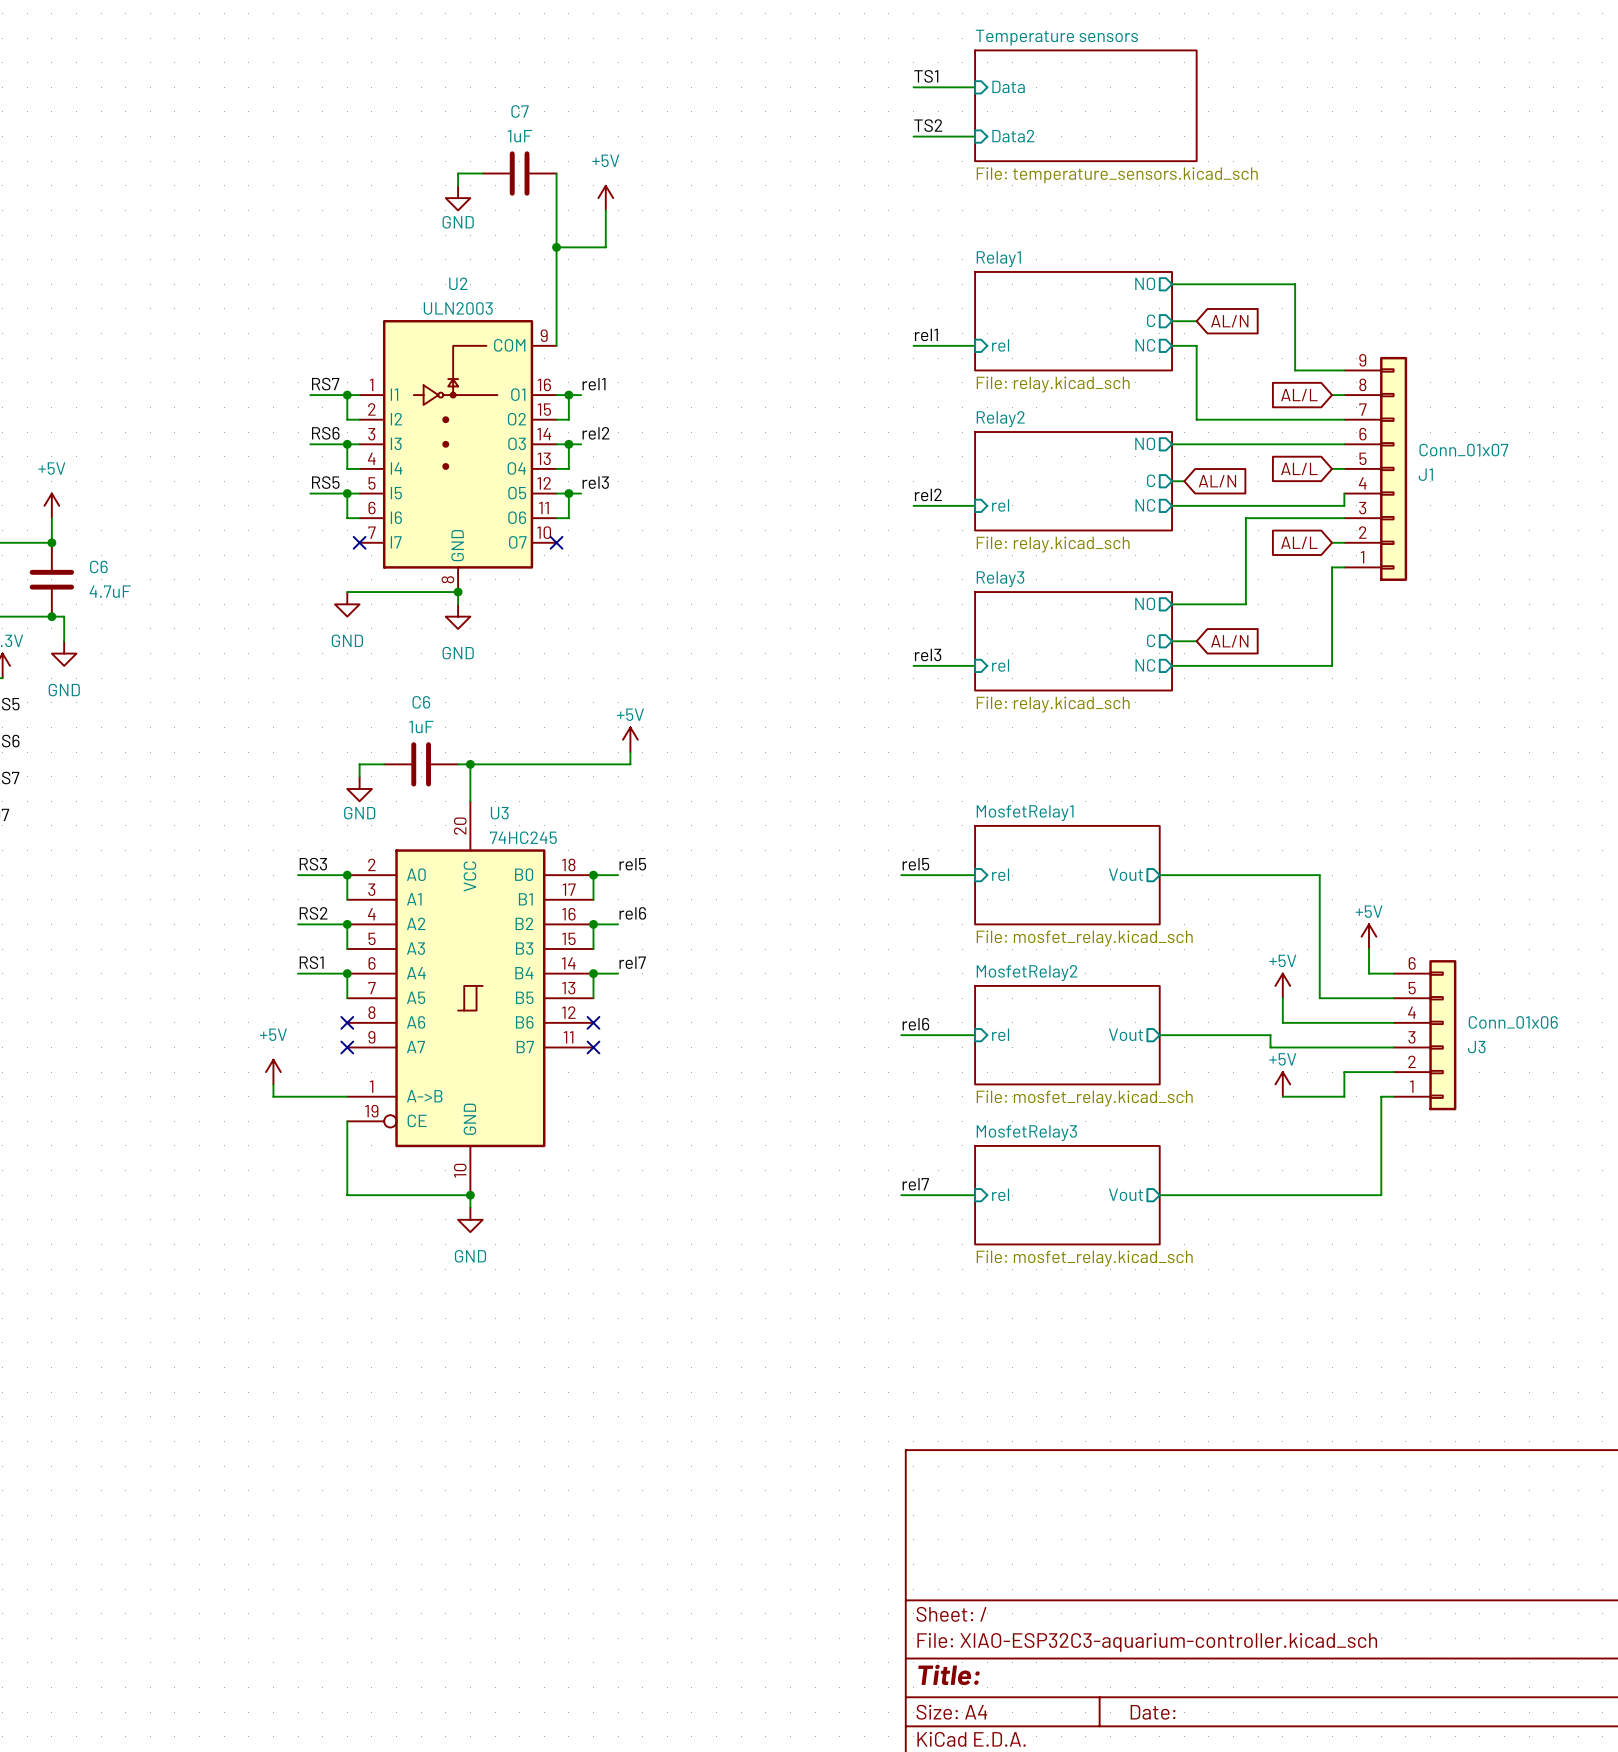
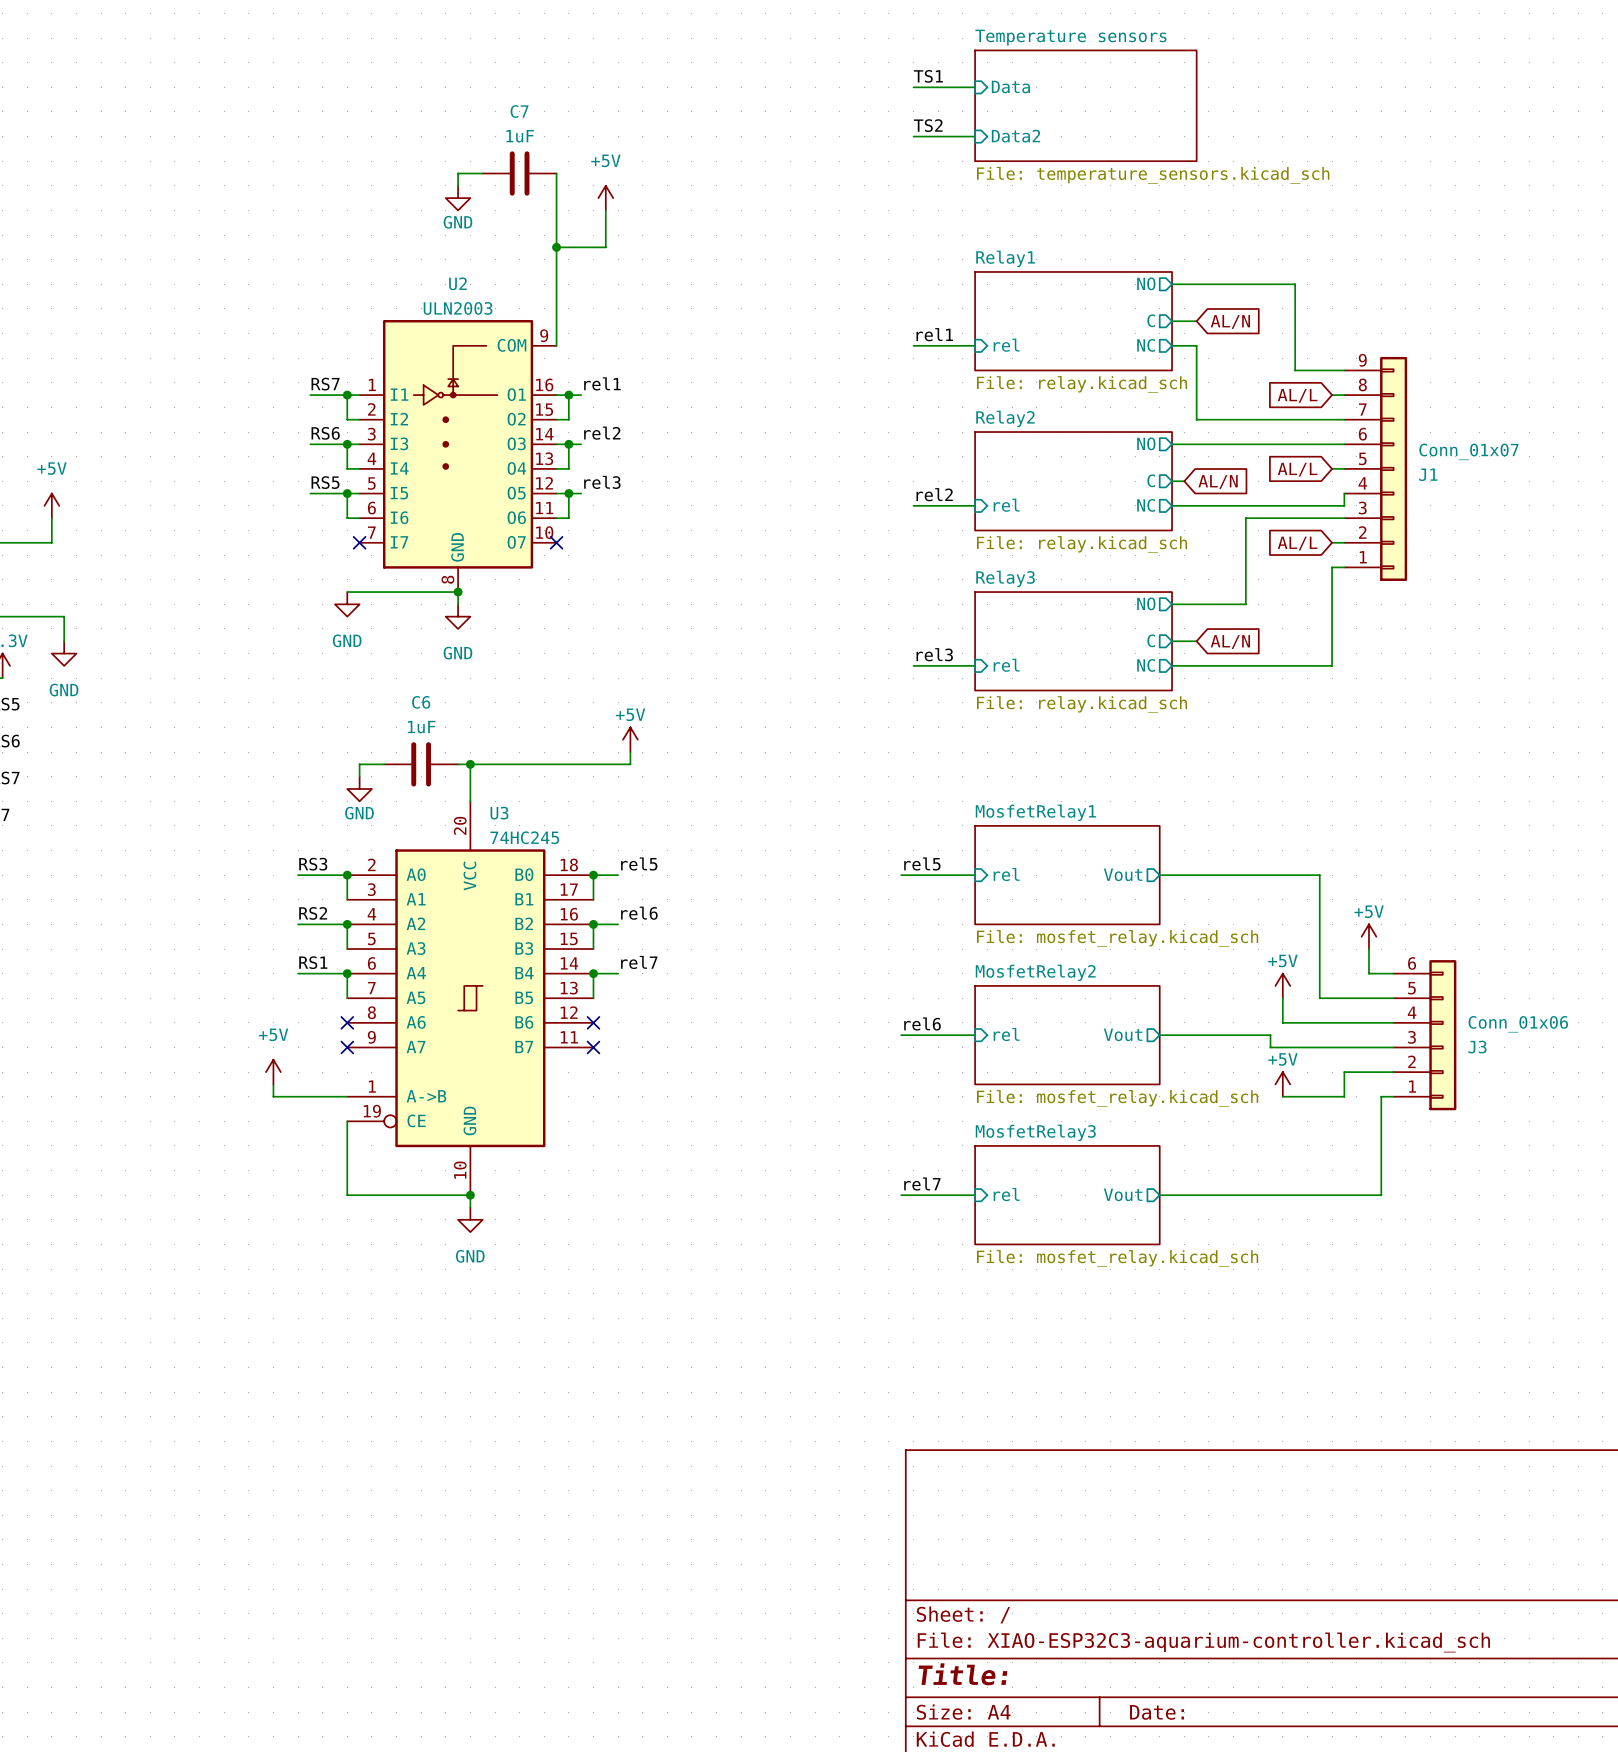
junction: (51, 542) -> none
C6: 4.7uF (51, 579) -> none
junction: (51, 616) -> none

